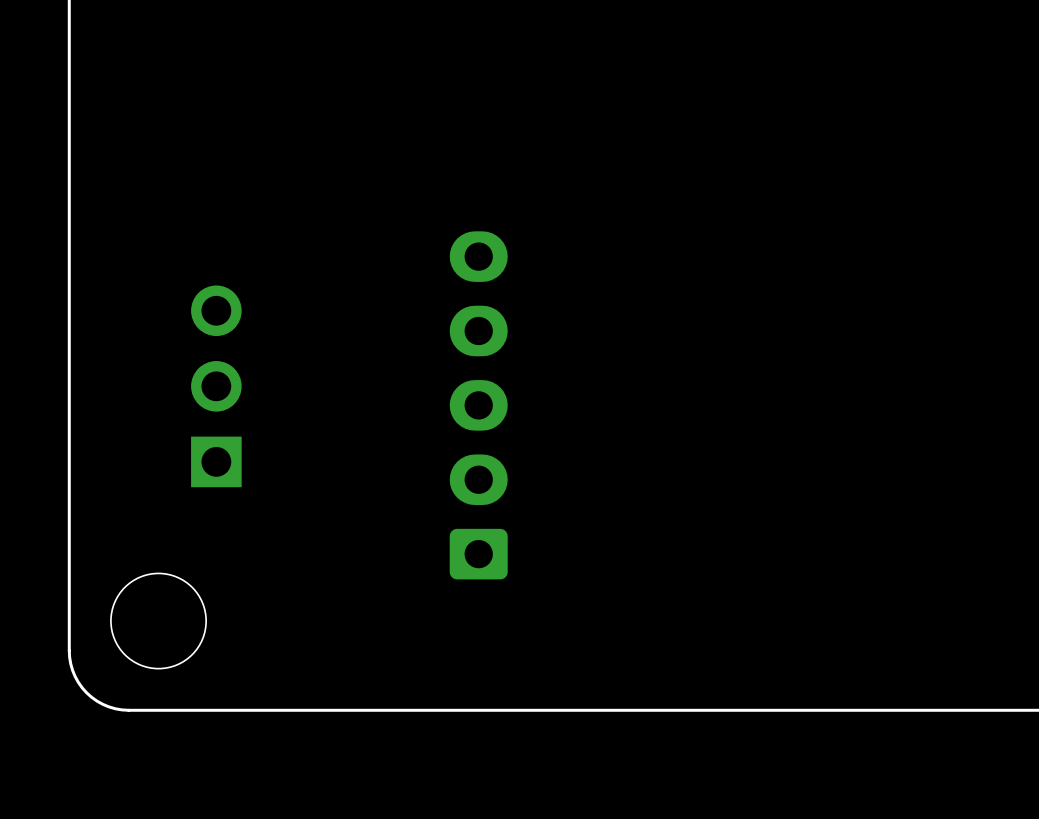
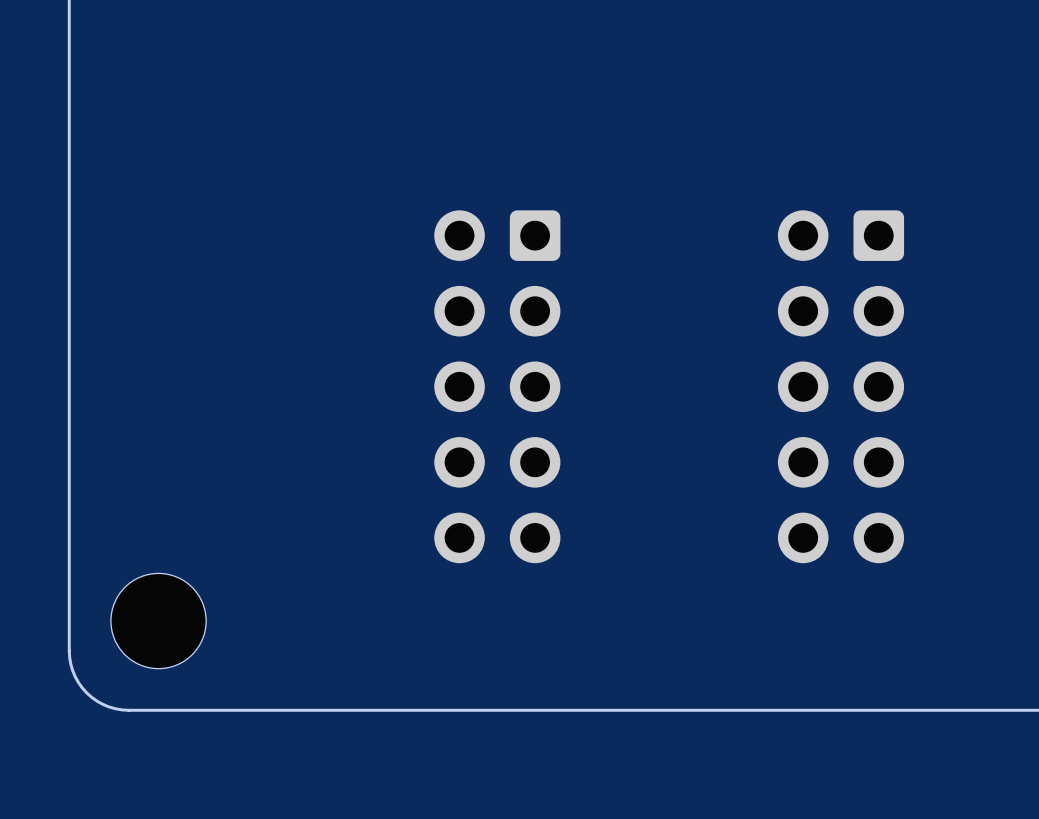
part footprint: [449, 231, 508, 580] -> [434, 210, 561, 564]
part: (216, 386) -> none
part: none -> (840, 386)

